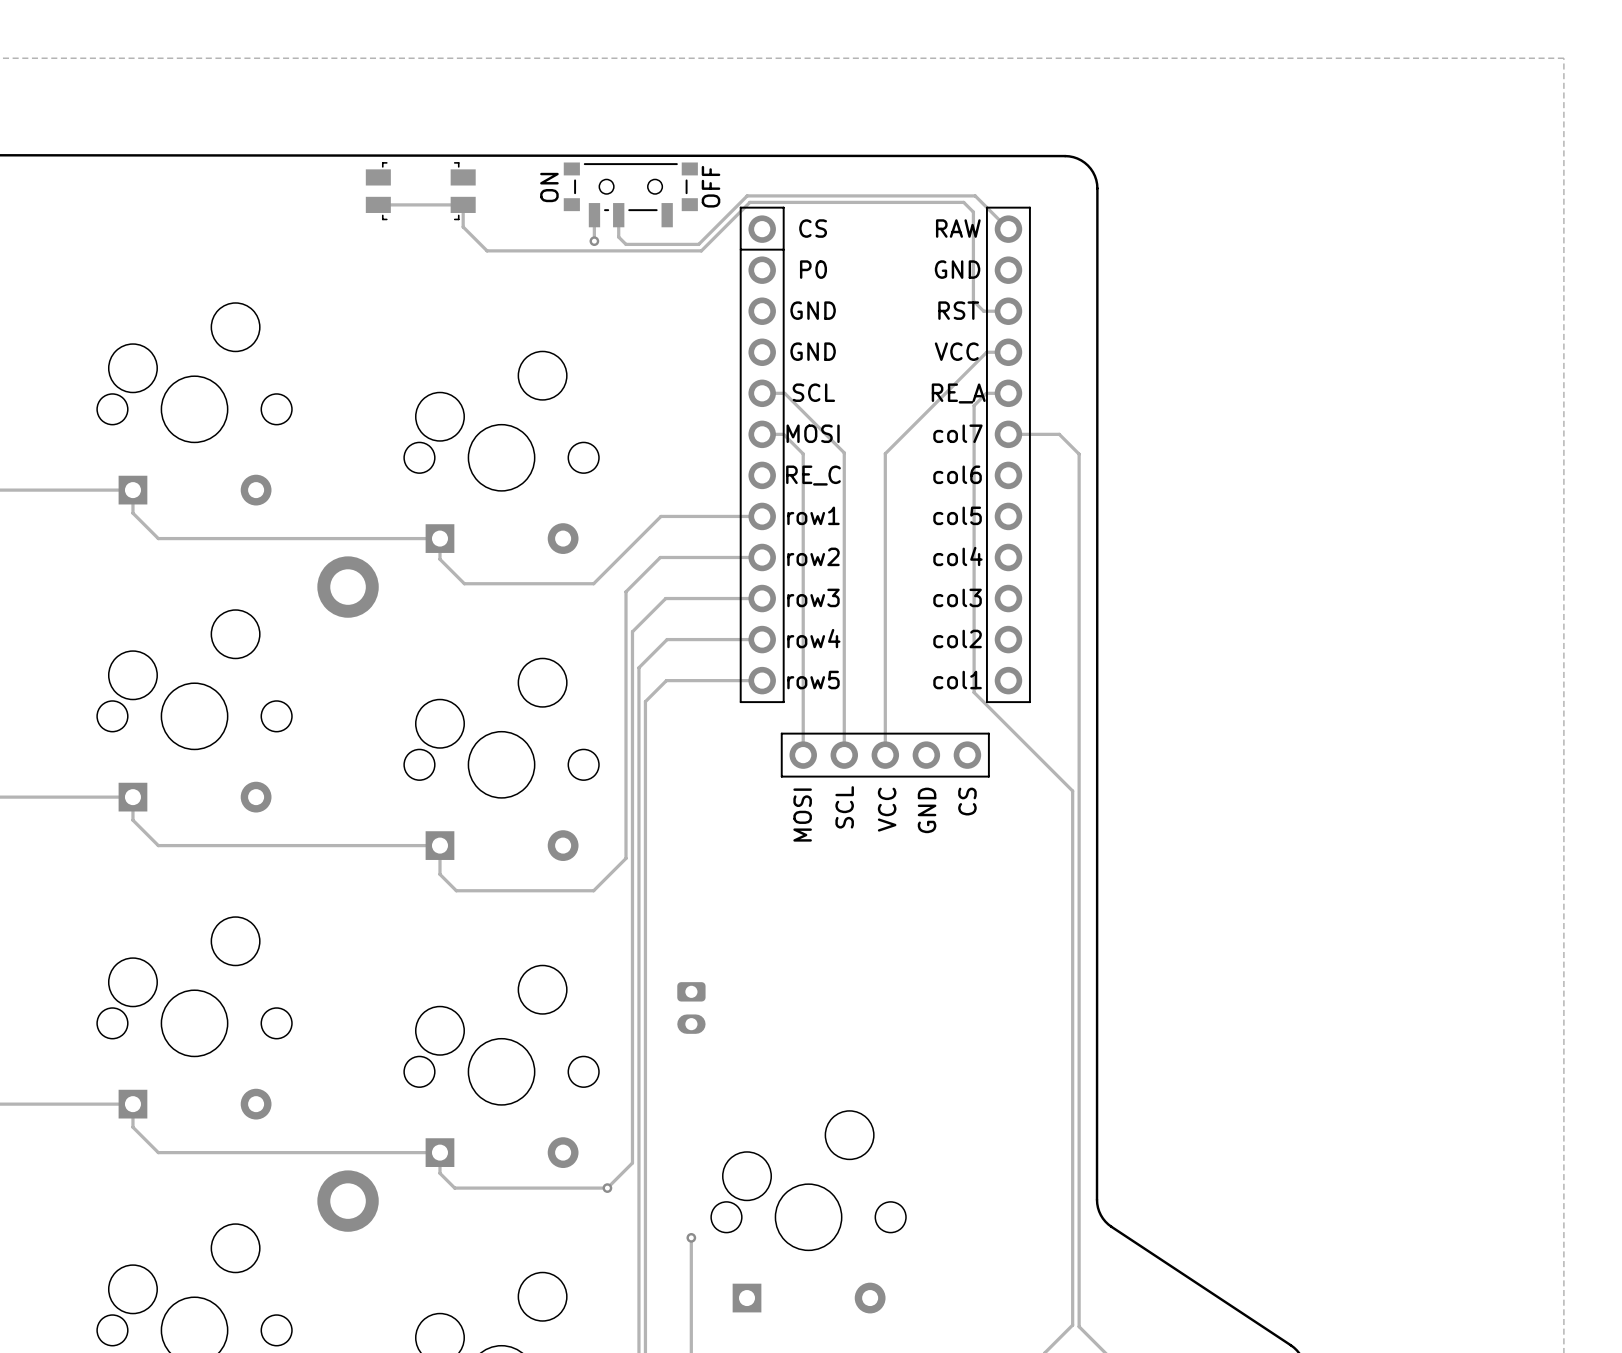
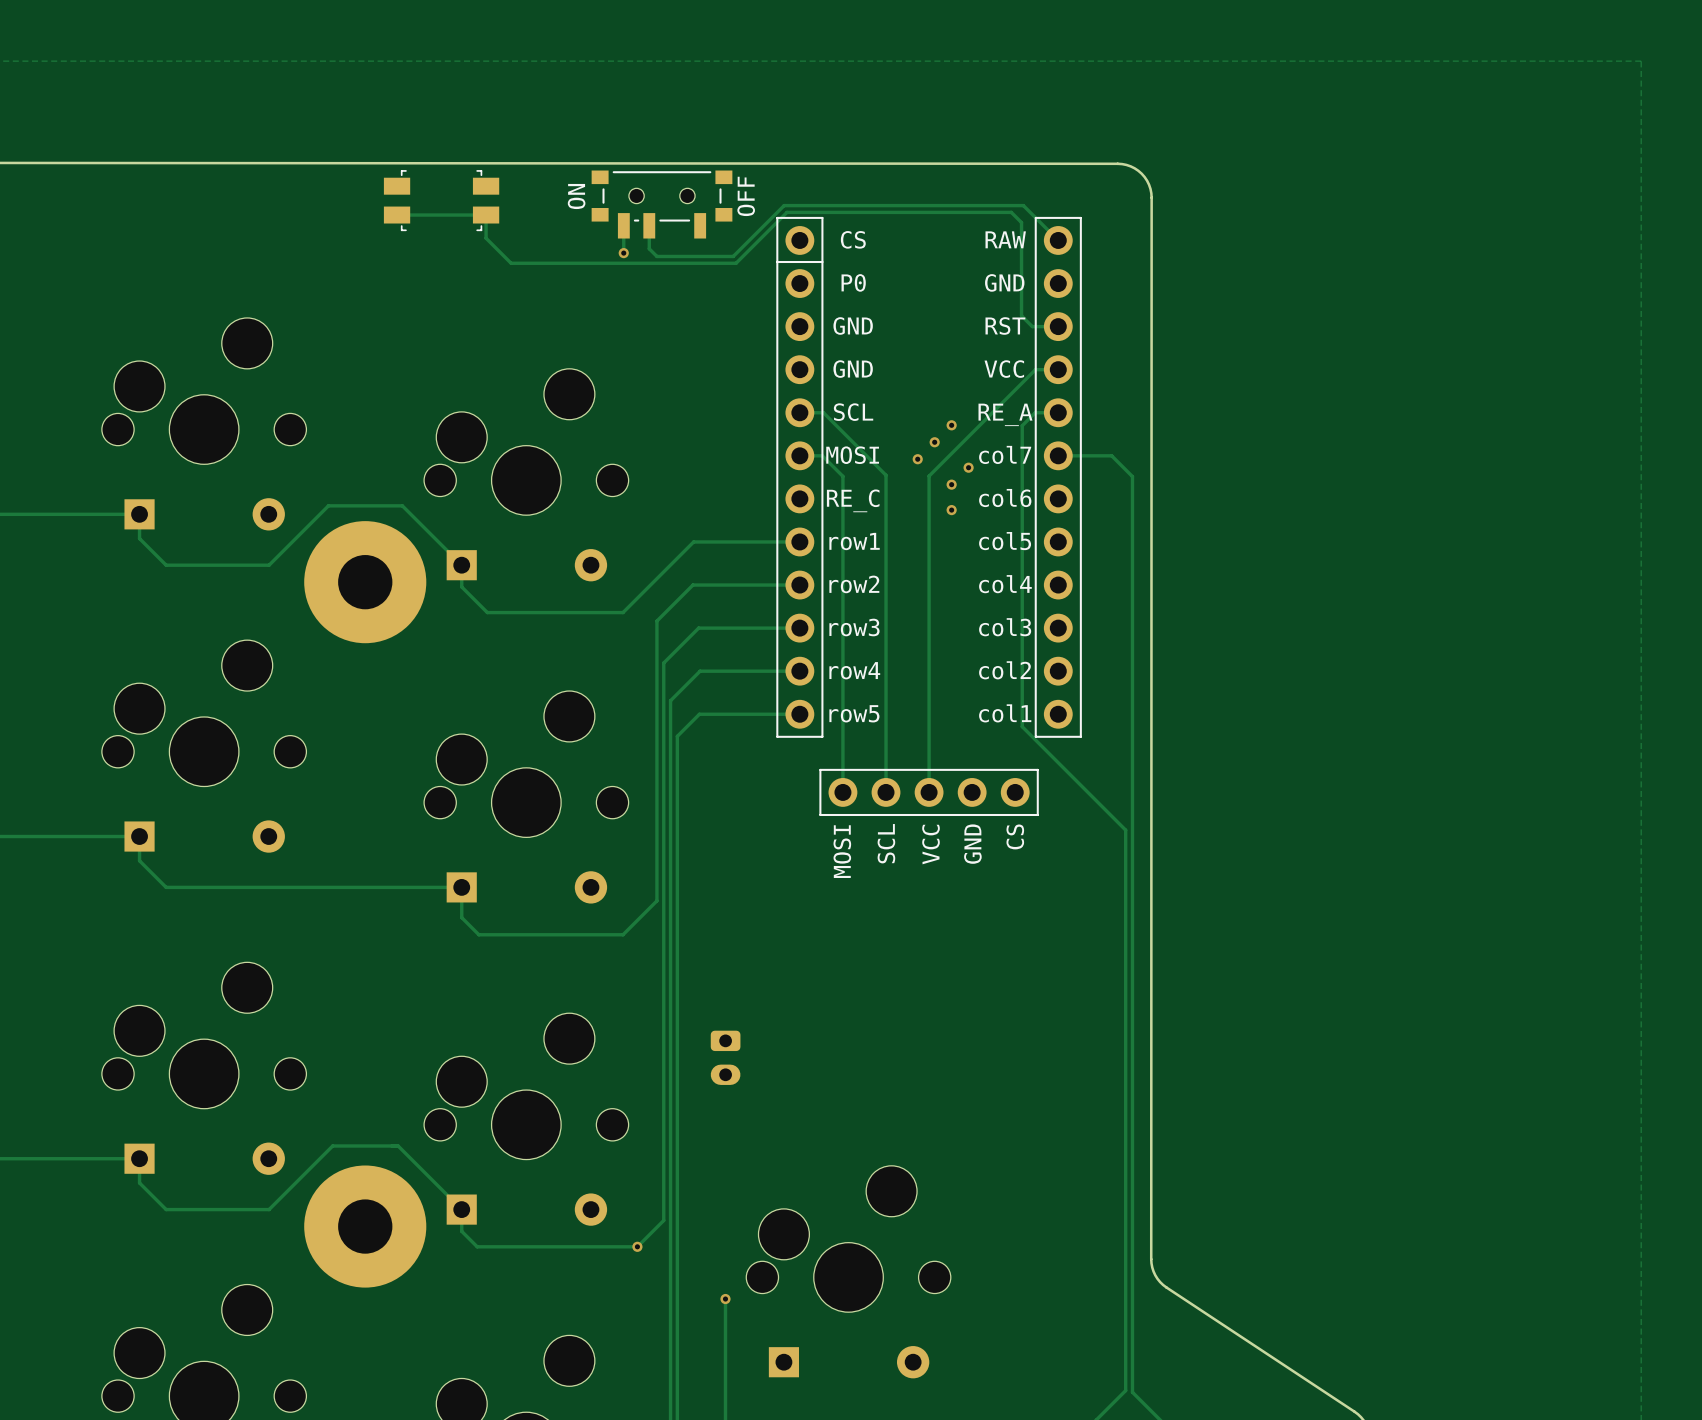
via: none -> (951, 425)
via: none -> (934, 442)
via: none -> (917, 459)
via: none -> (968, 467)
via: none -> (951, 484)
via: none -> (951, 510)
track: (256, 538) (439, 538) -> (269, 565) (328, 505) (402, 505) (461, 565) (461, 558)
part: none -> (365, 582)
part: (348, 587) -> none
track: (256, 1152) (439, 1152) -> (269, 1209) (332, 1146) (398, 1146) (461, 1209)
part: none -> (365, 1226)
part: (348, 1201) -> none

